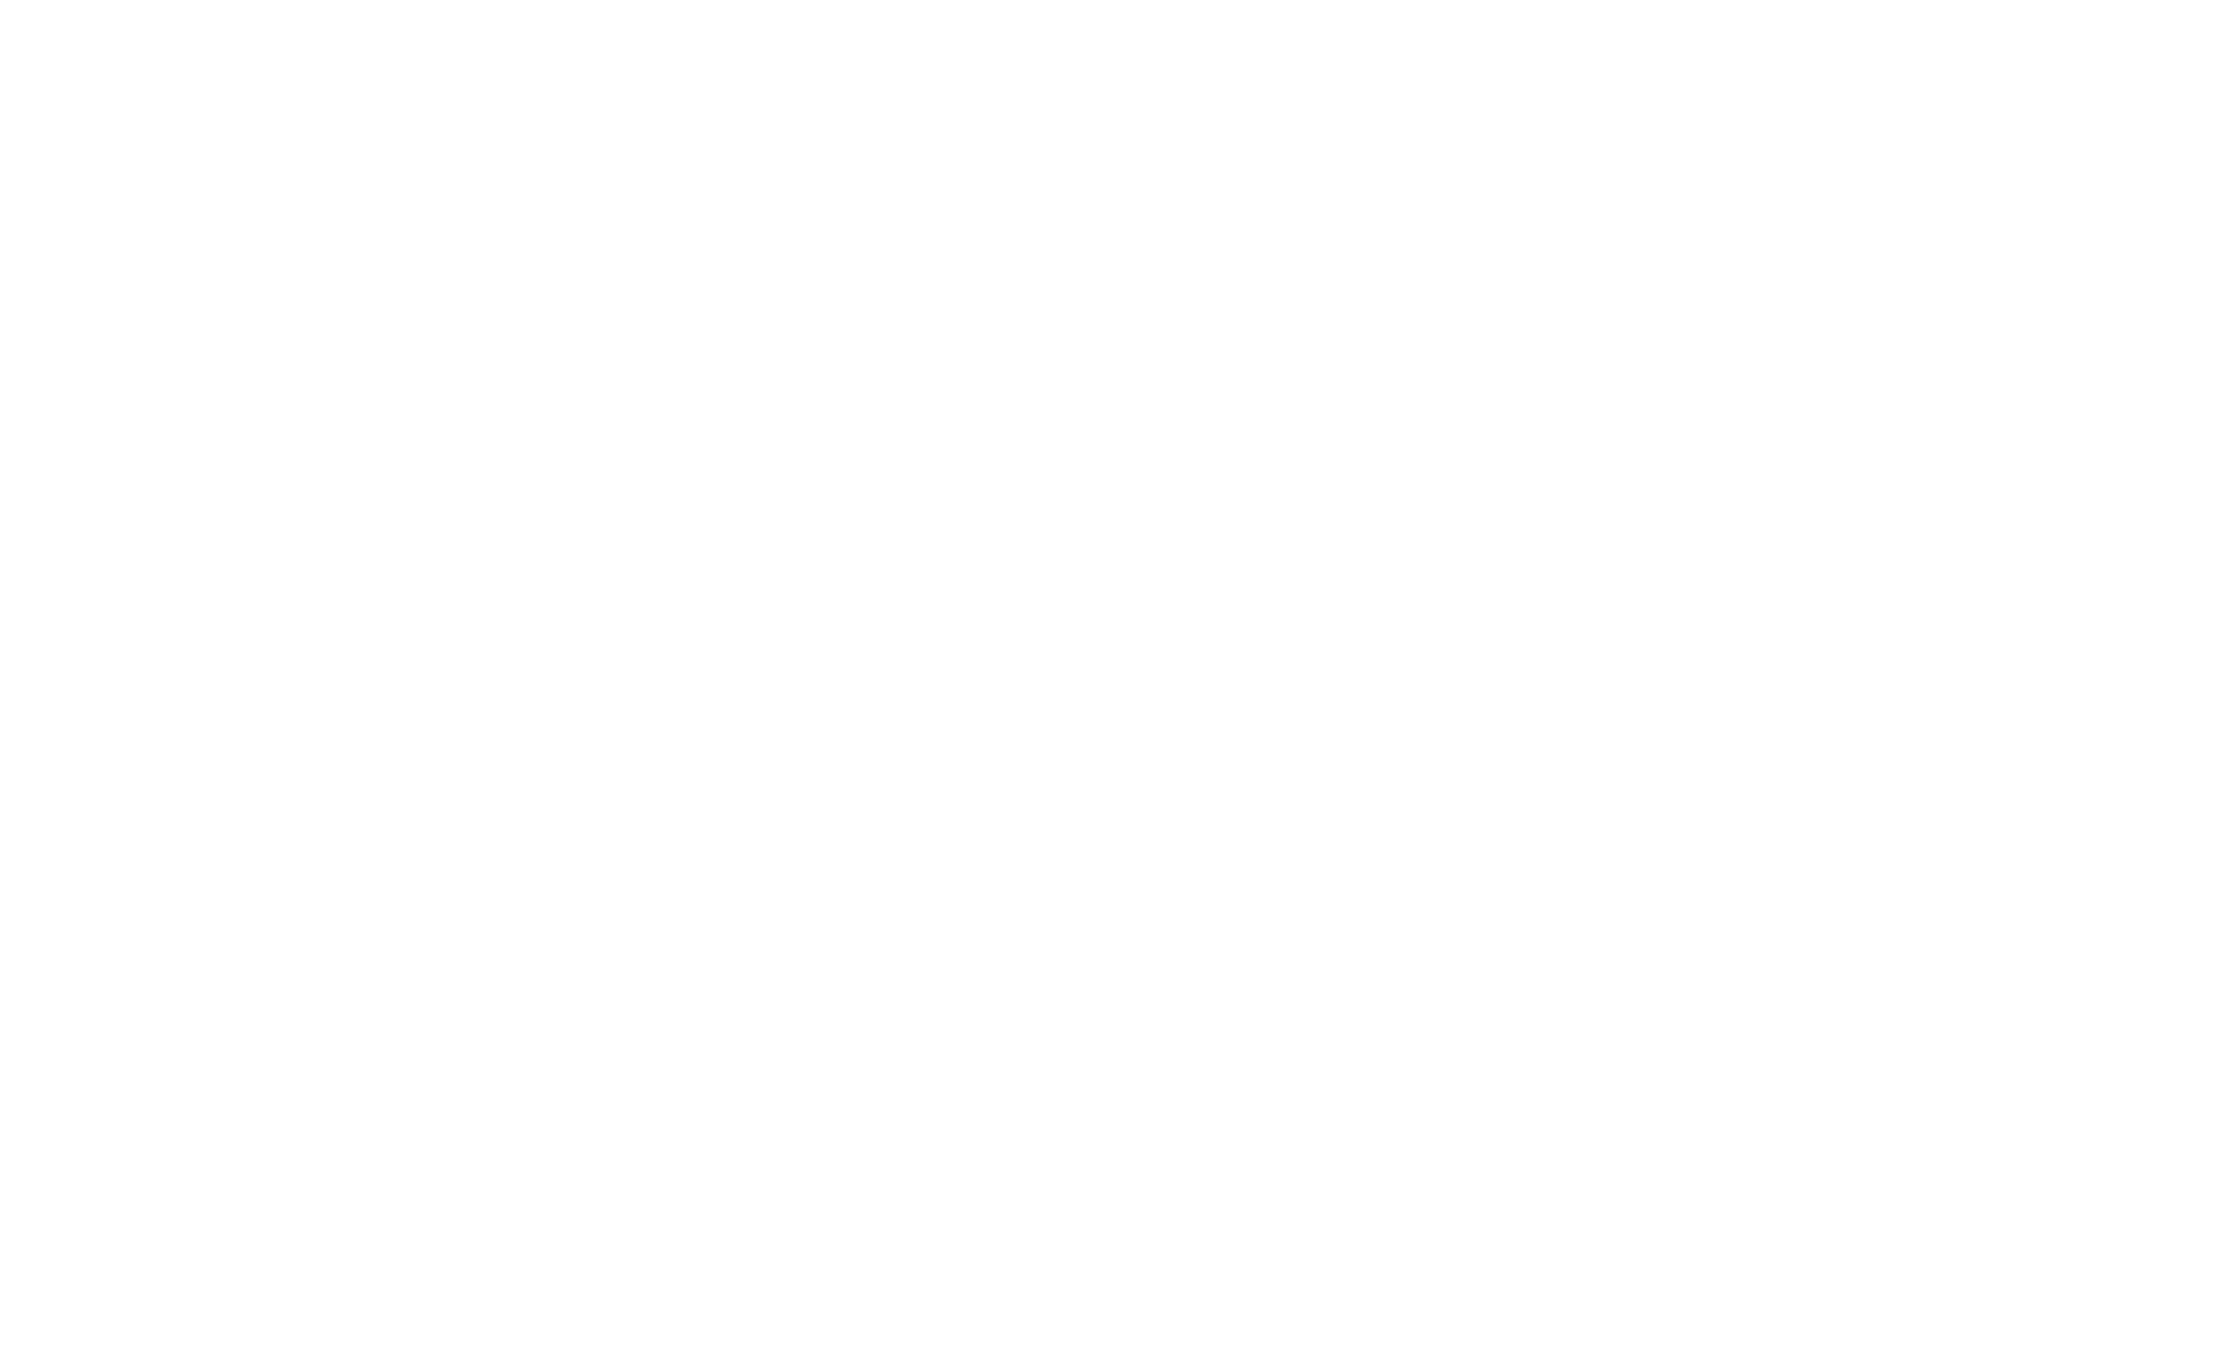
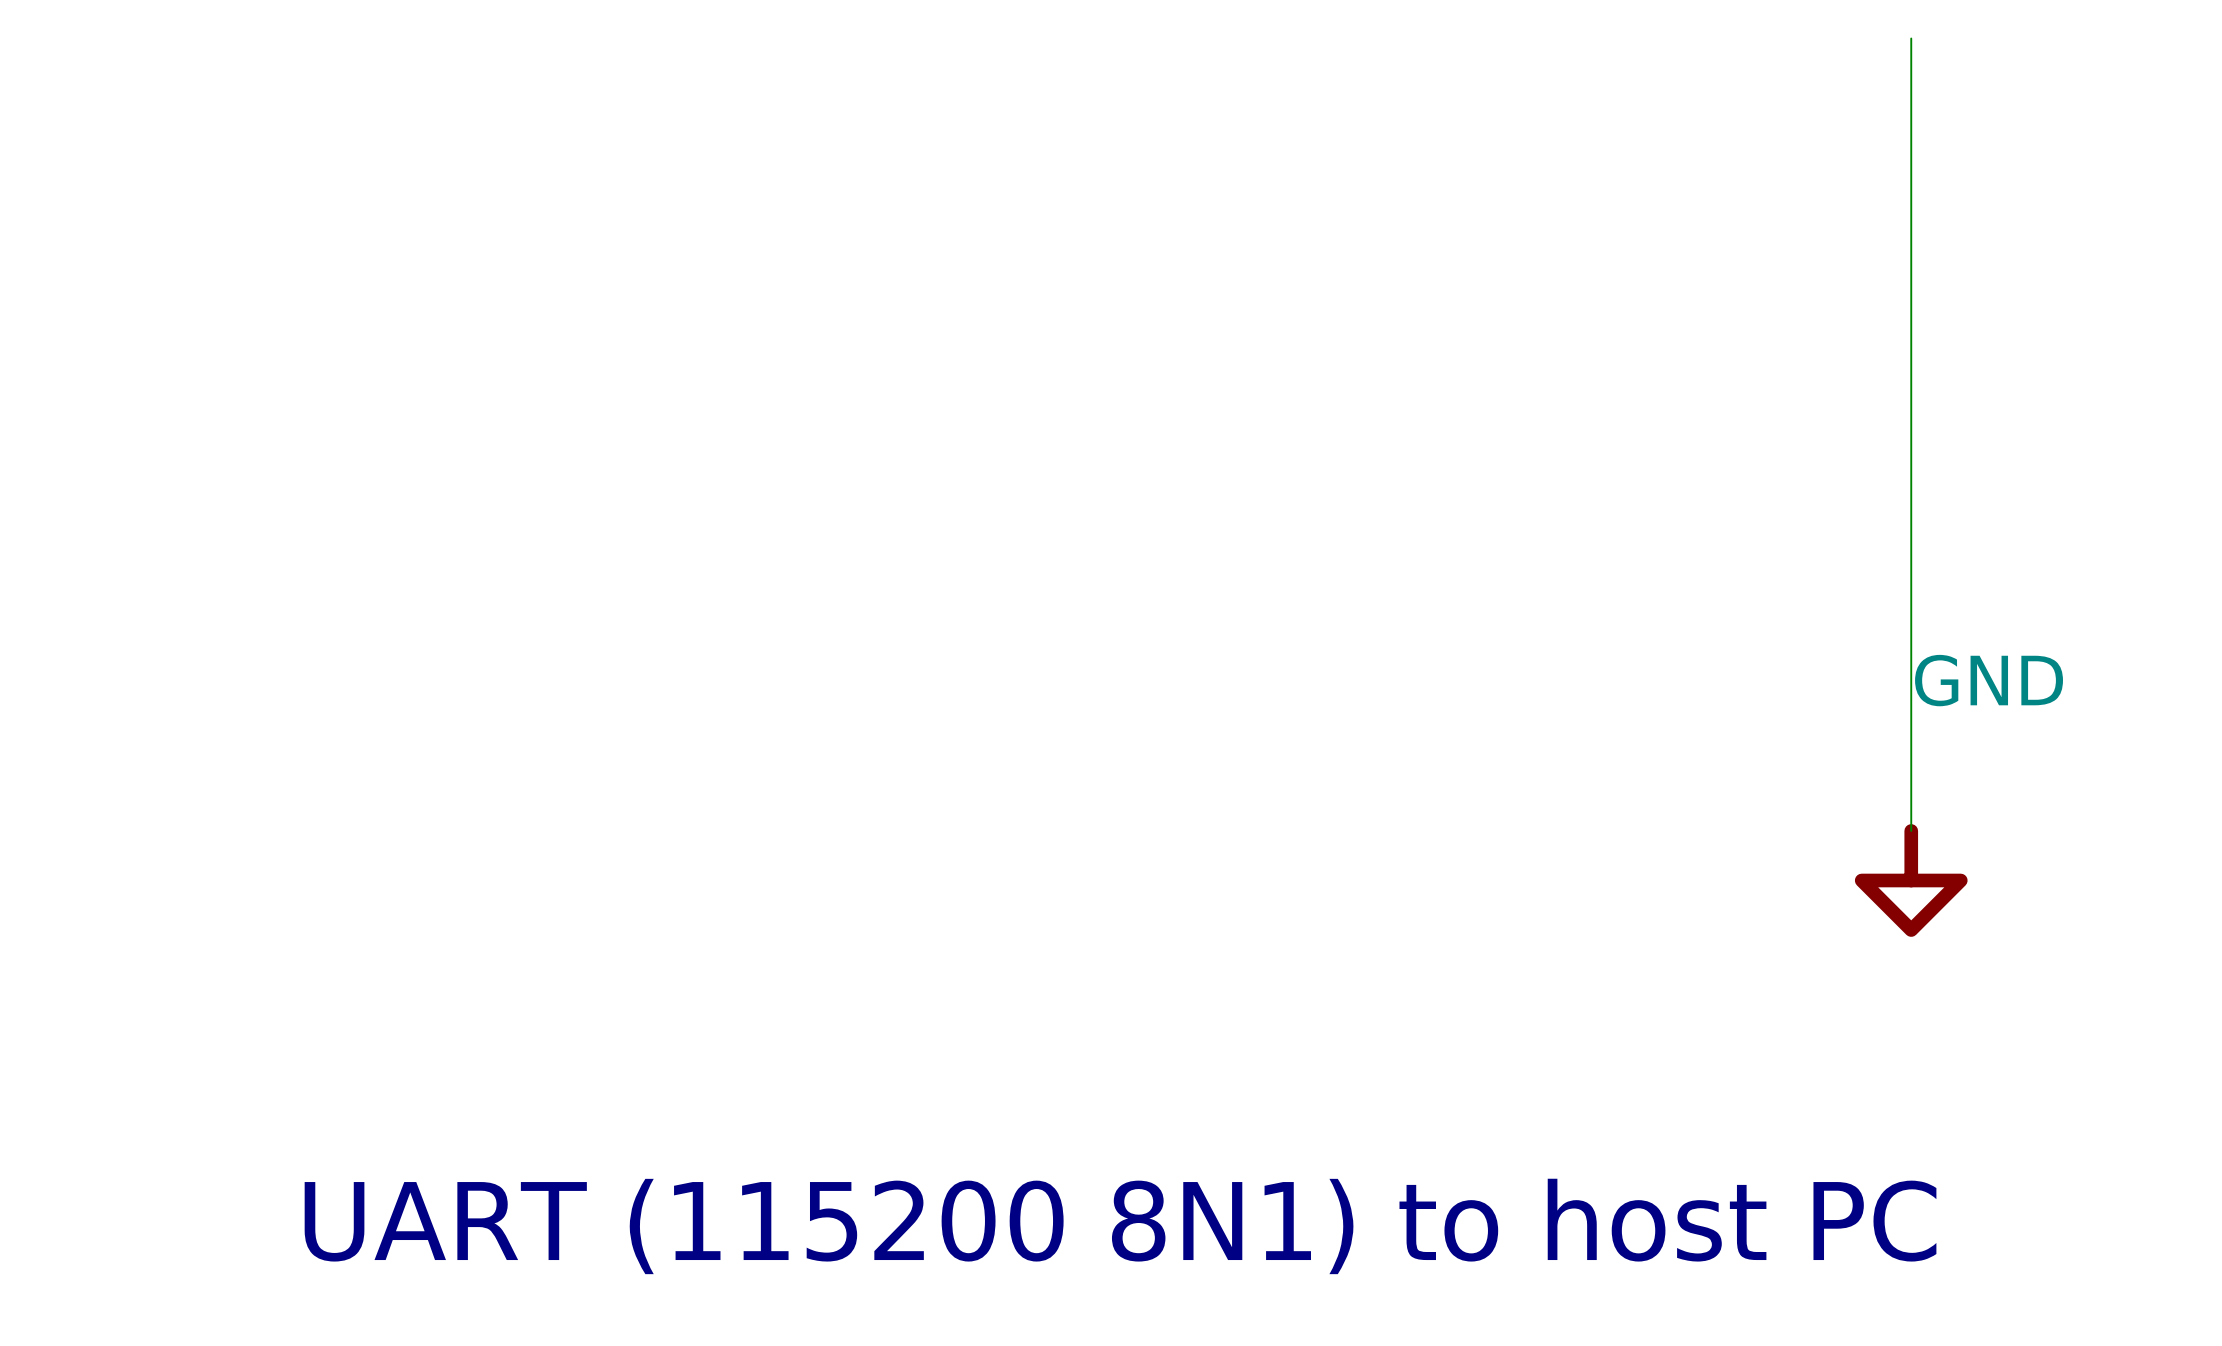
wire: none -> (1911, 38) (1911, 830)
power symbol: none -> GND (1911, 880)
text: none -> UART (115200 8N1) to host PC (1120, 1226)

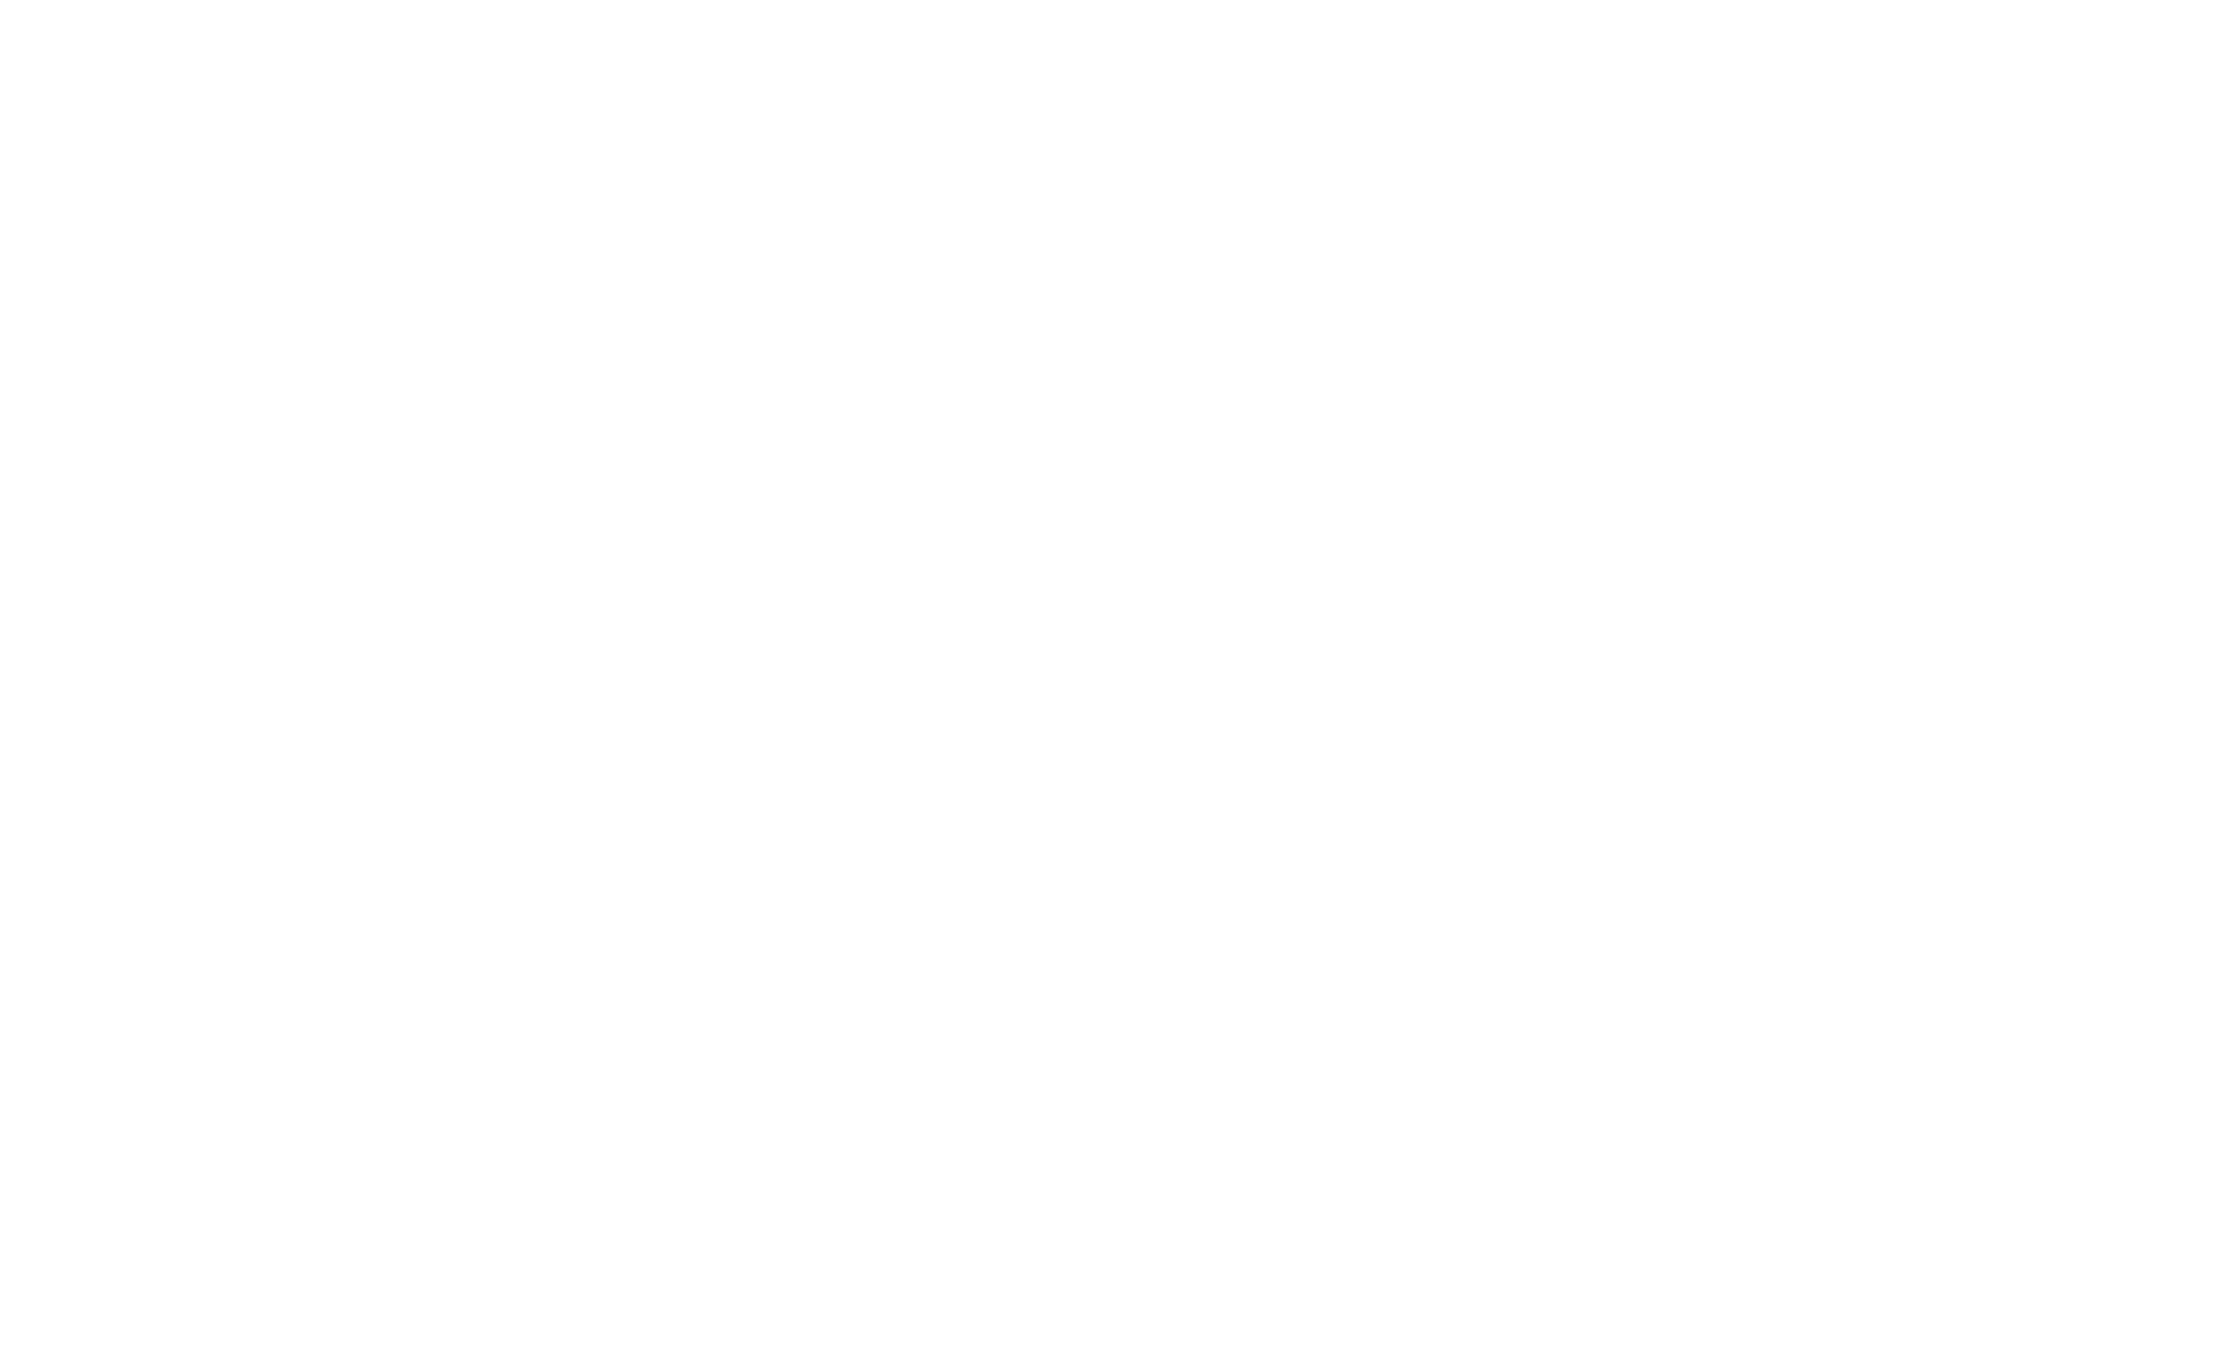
wire: (1911, 38) (1911, 830) -> none
power symbol: GND (1911, 880) -> none
text: UART (115200 8N1) to host PC (1120, 1226) -> none

